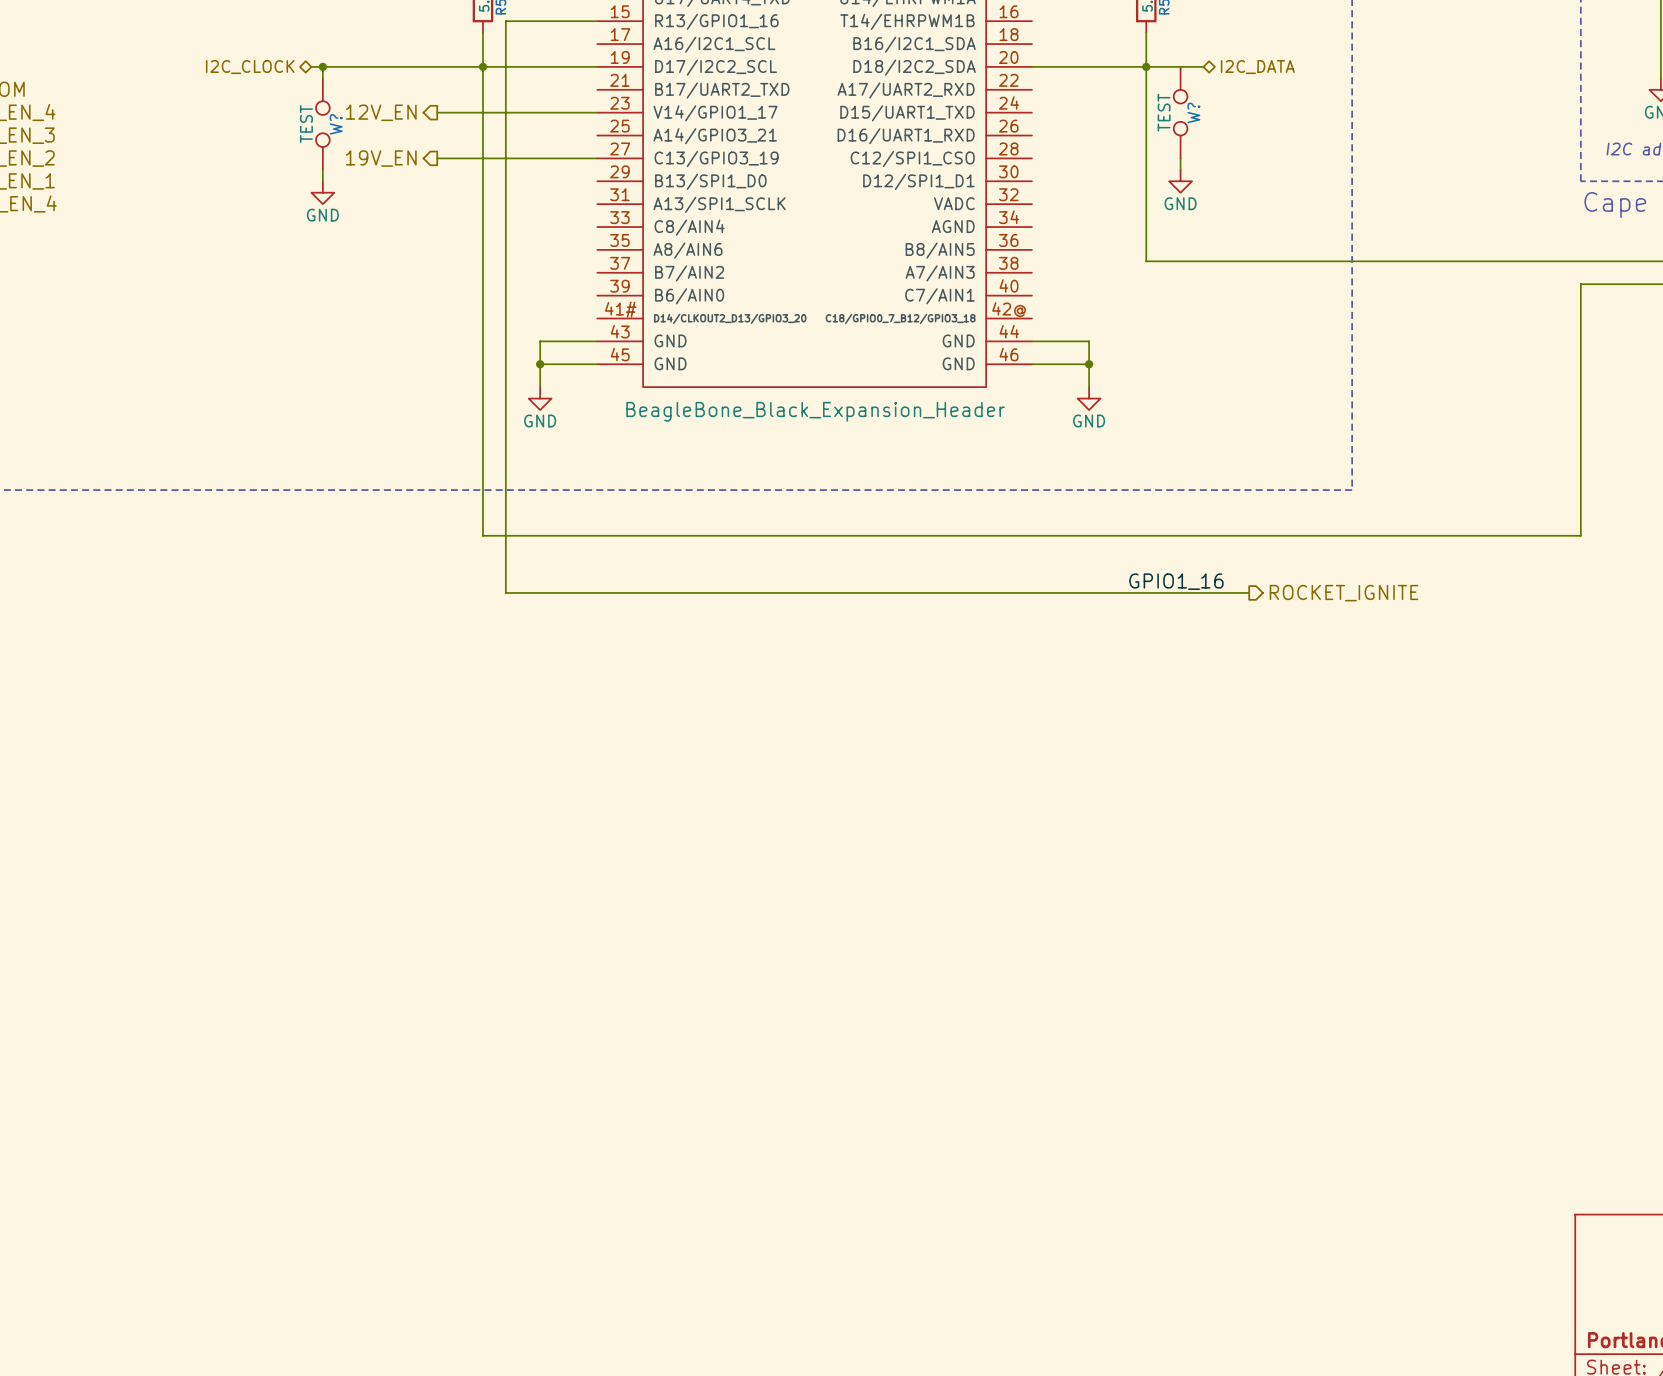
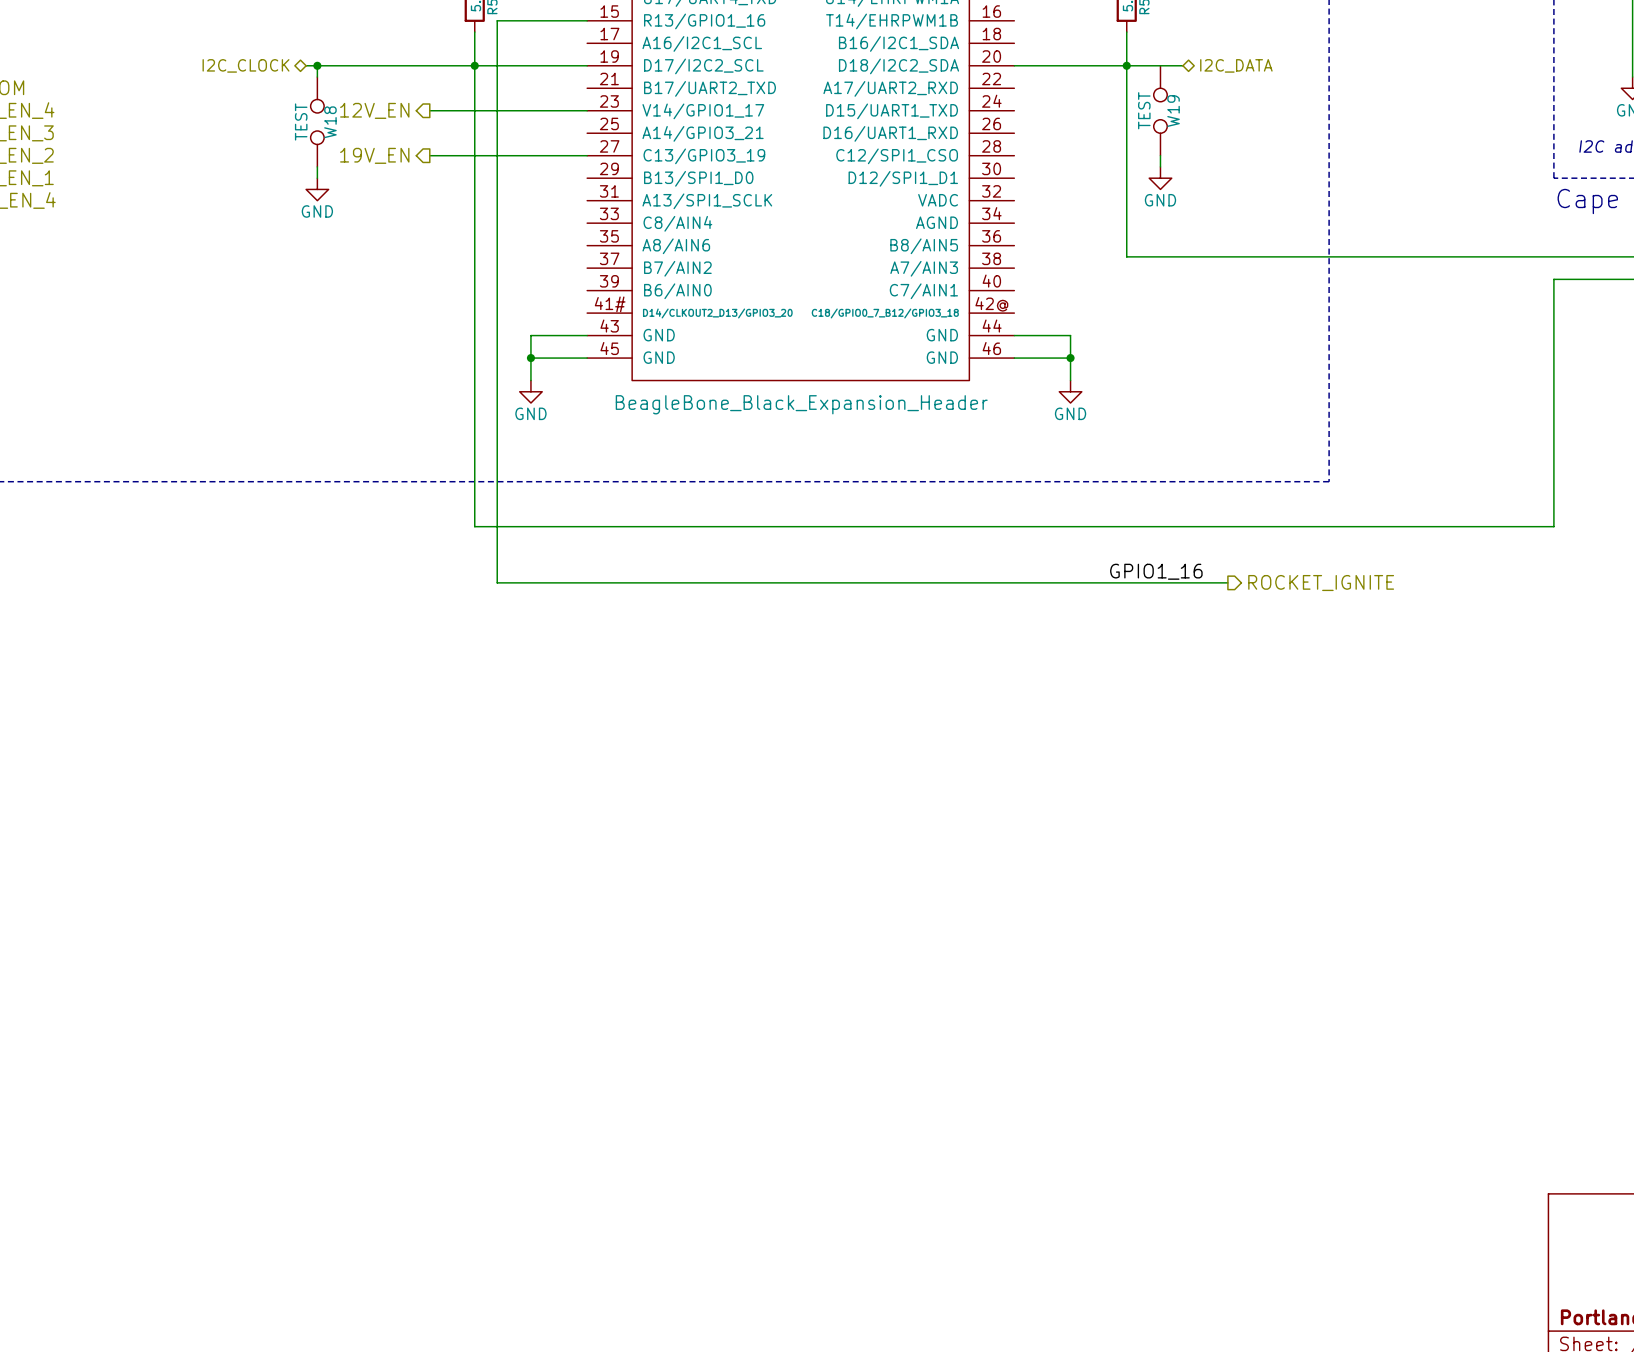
W? name: W? (1193, 112) -> W19 (1173, 111)
W? name: W? (336, 124) -> W18 (330, 122)

